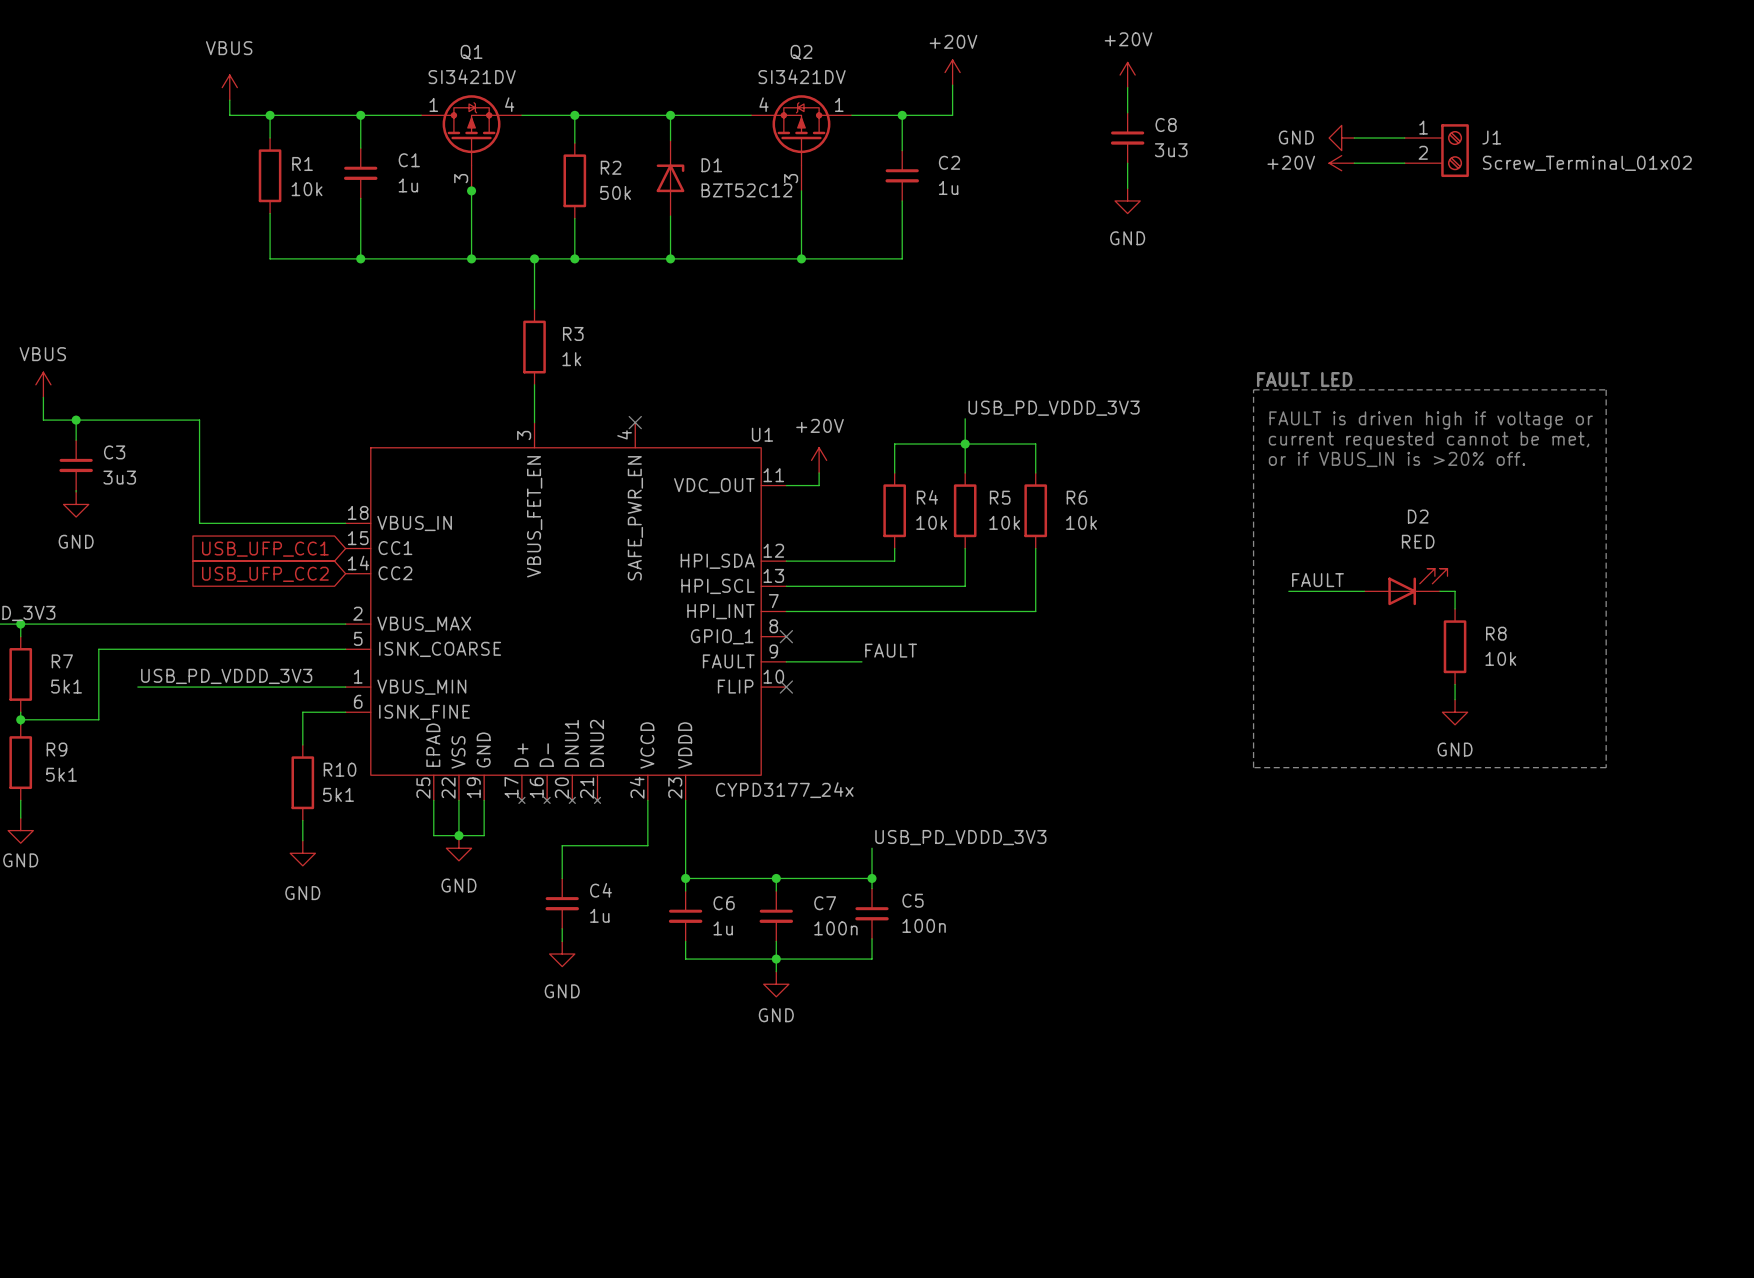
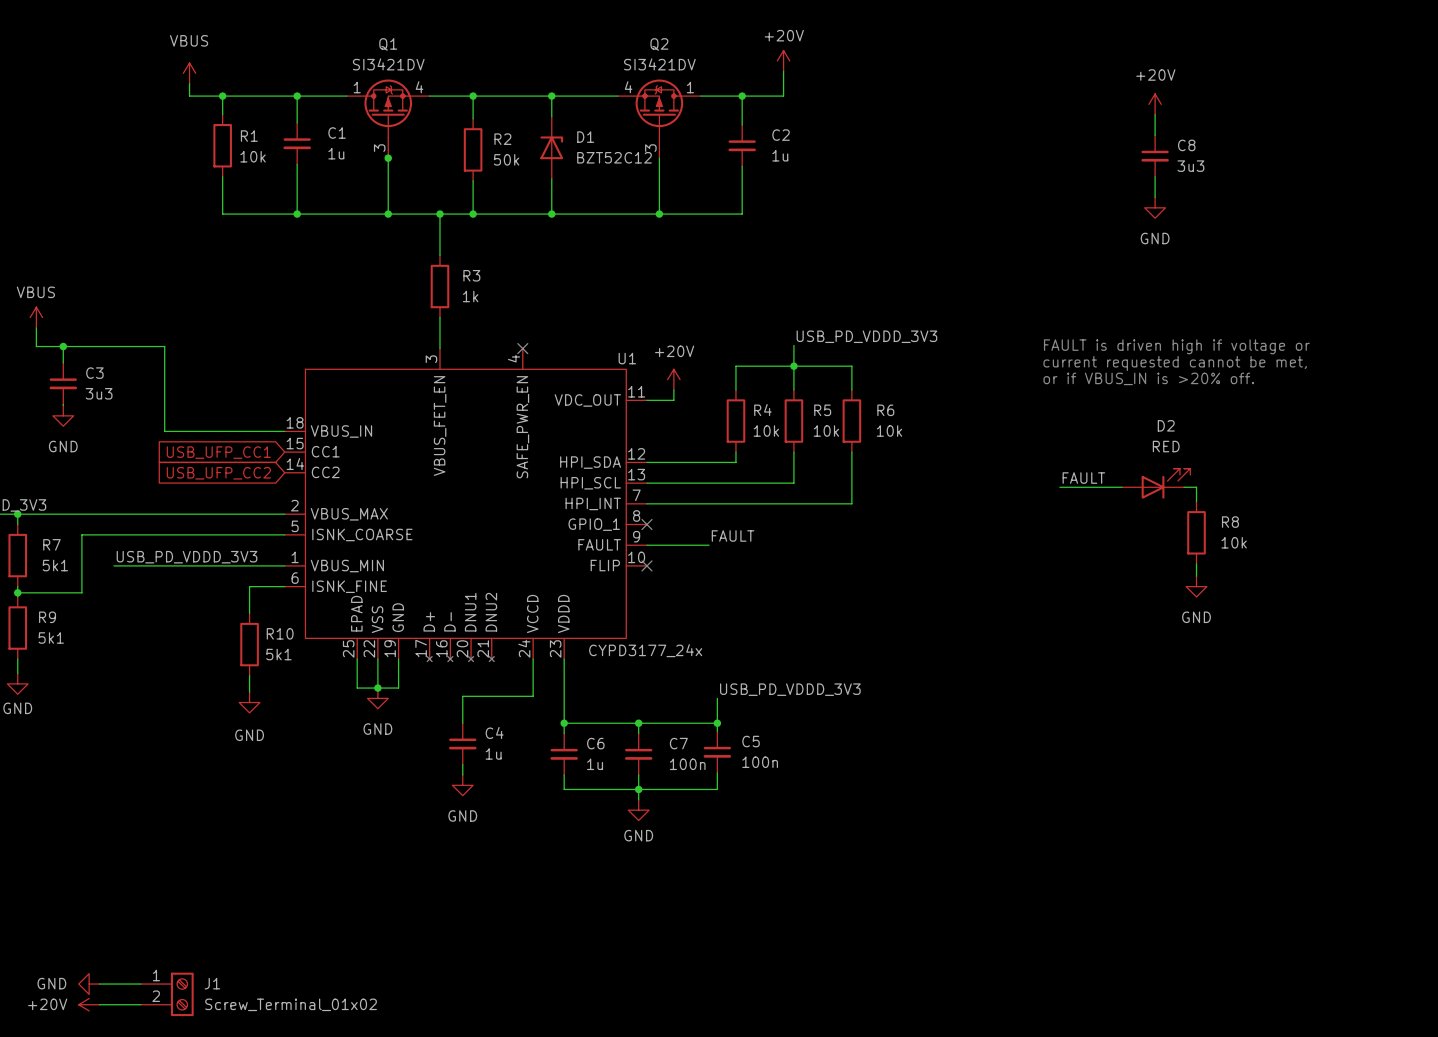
power symbol: +20V (1127, 75) -> none
wire: (1127, 87) (1127, 112) -> none
C8 position: (1127, 138) -> (1155, 156)
power symbol rotation: 0° (1341, 138) -> 90° counterclockwise (1155, 207)
power symbol position: GND (1341, 138) -> GND (1155, 207)
wire: (1354, 138) (1404, 138) -> (1155, 135) (1155, 114)
J1 position: (1436, 150) -> (167, 994)
wire: (1127, 163) (1127, 188) -> none
power symbol rotation: 0° (1341, 163) -> 90° clockwise (1155, 104)
power symbol position: +20V (1341, 163) -> +20V (1155, 104)
wire: (1354, 163) (1404, 163) -> none
power symbol: GND (1127, 200) -> none
wire: none -> (1155, 176) (1155, 197)
text: FAULT LED (1304, 379) -> none
line: (1253, 389) (1606, 389) (1606, 767) (1253, 767) (1253, 389) -> none
power symbol: none -> GND (89, 984)
wire: none -> (99, 984) (140, 984)
power symbol: none -> +20V (89, 1004)
wire: none -> (99, 1004) (140, 1004)

